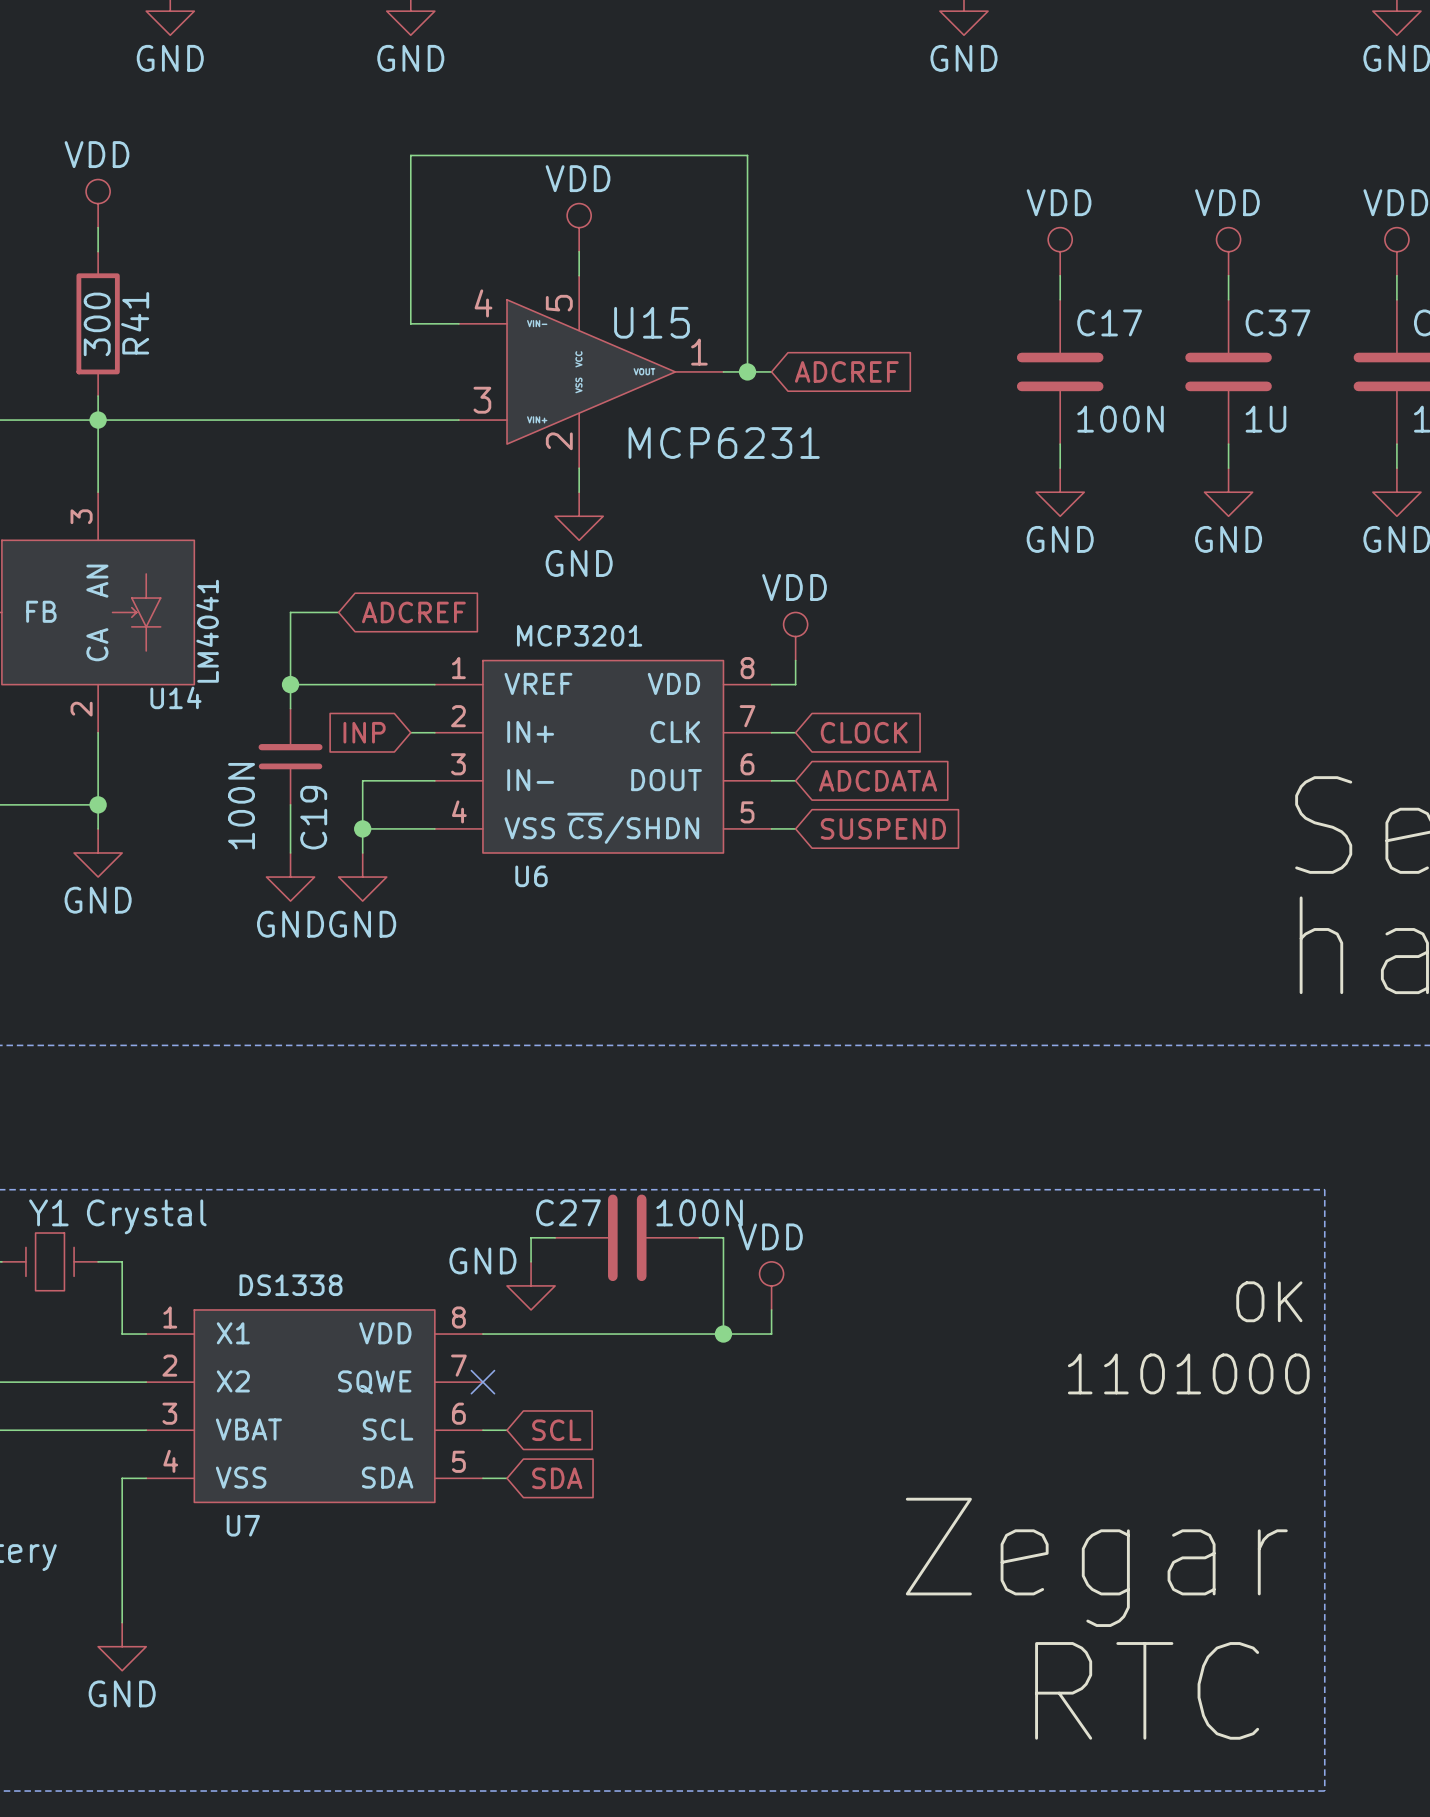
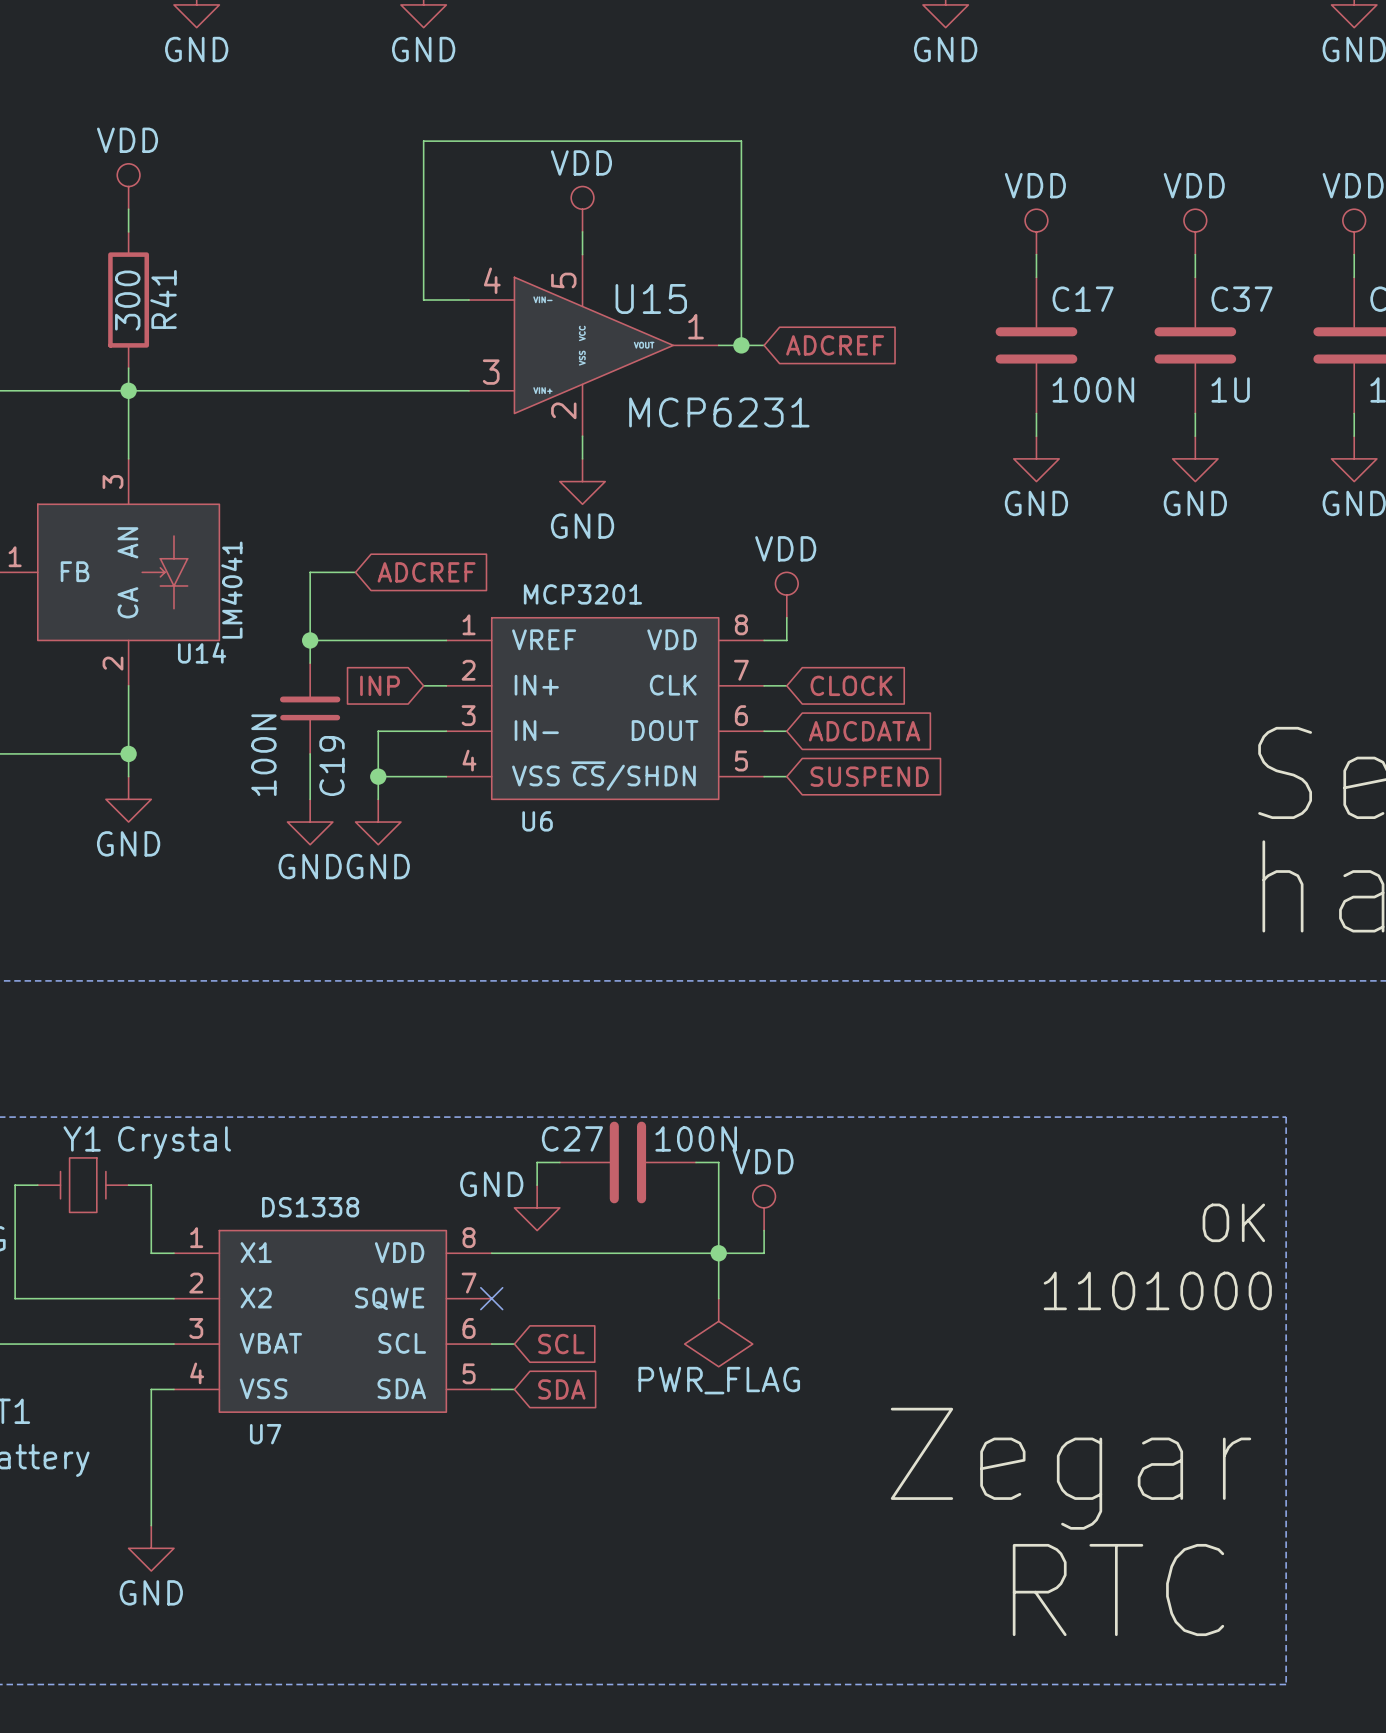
wire: none -> (718, 1253) (718, 1298)
power symbol: none -> PWR_FLAG (718, 1332)

